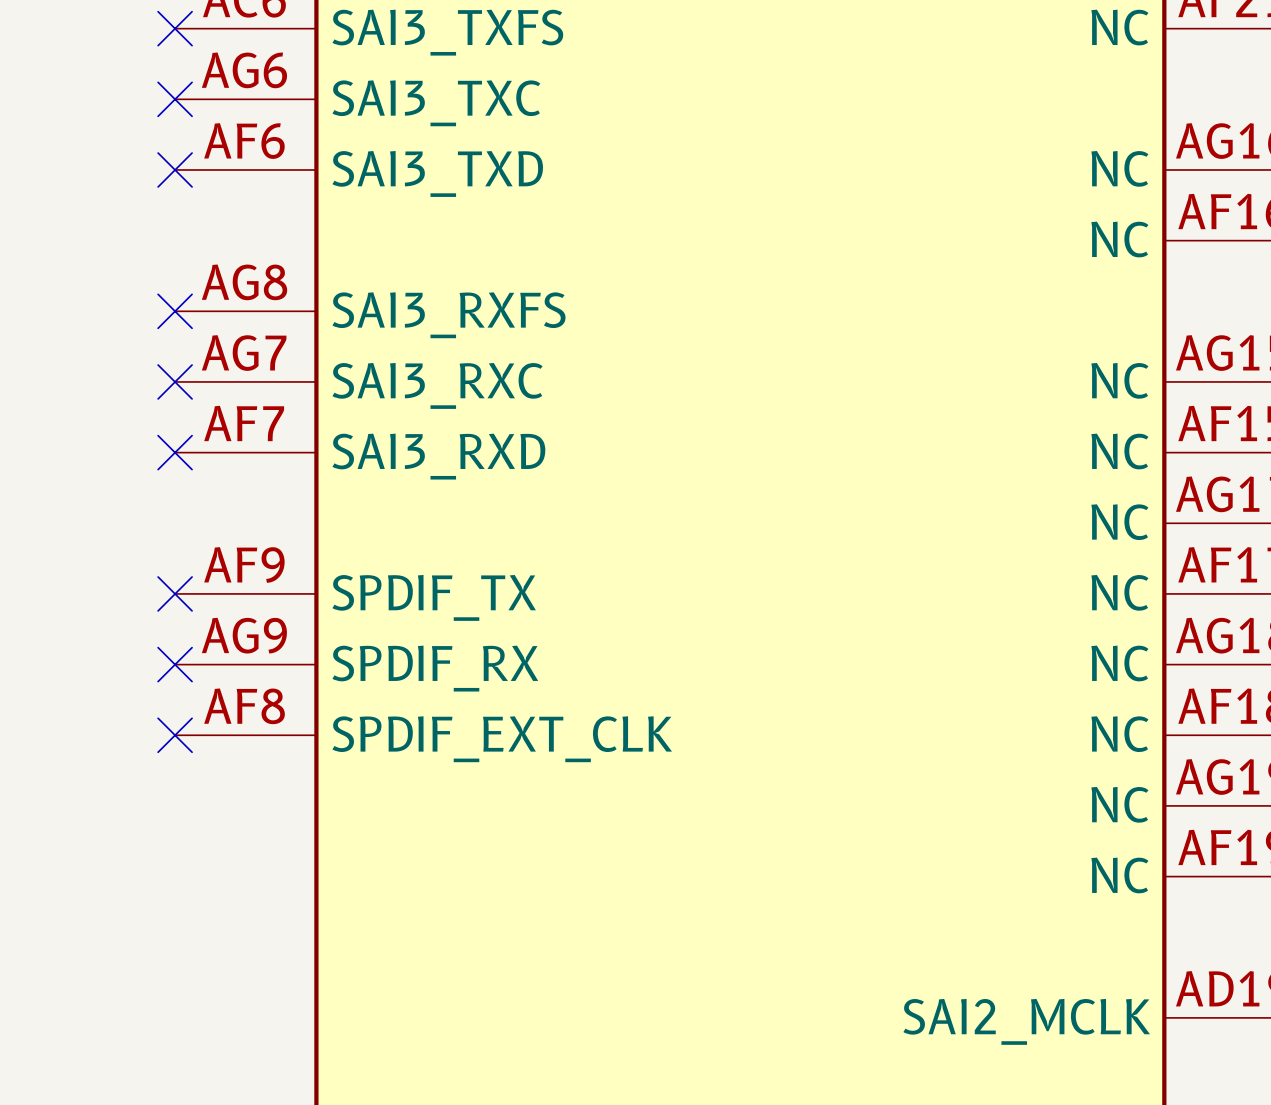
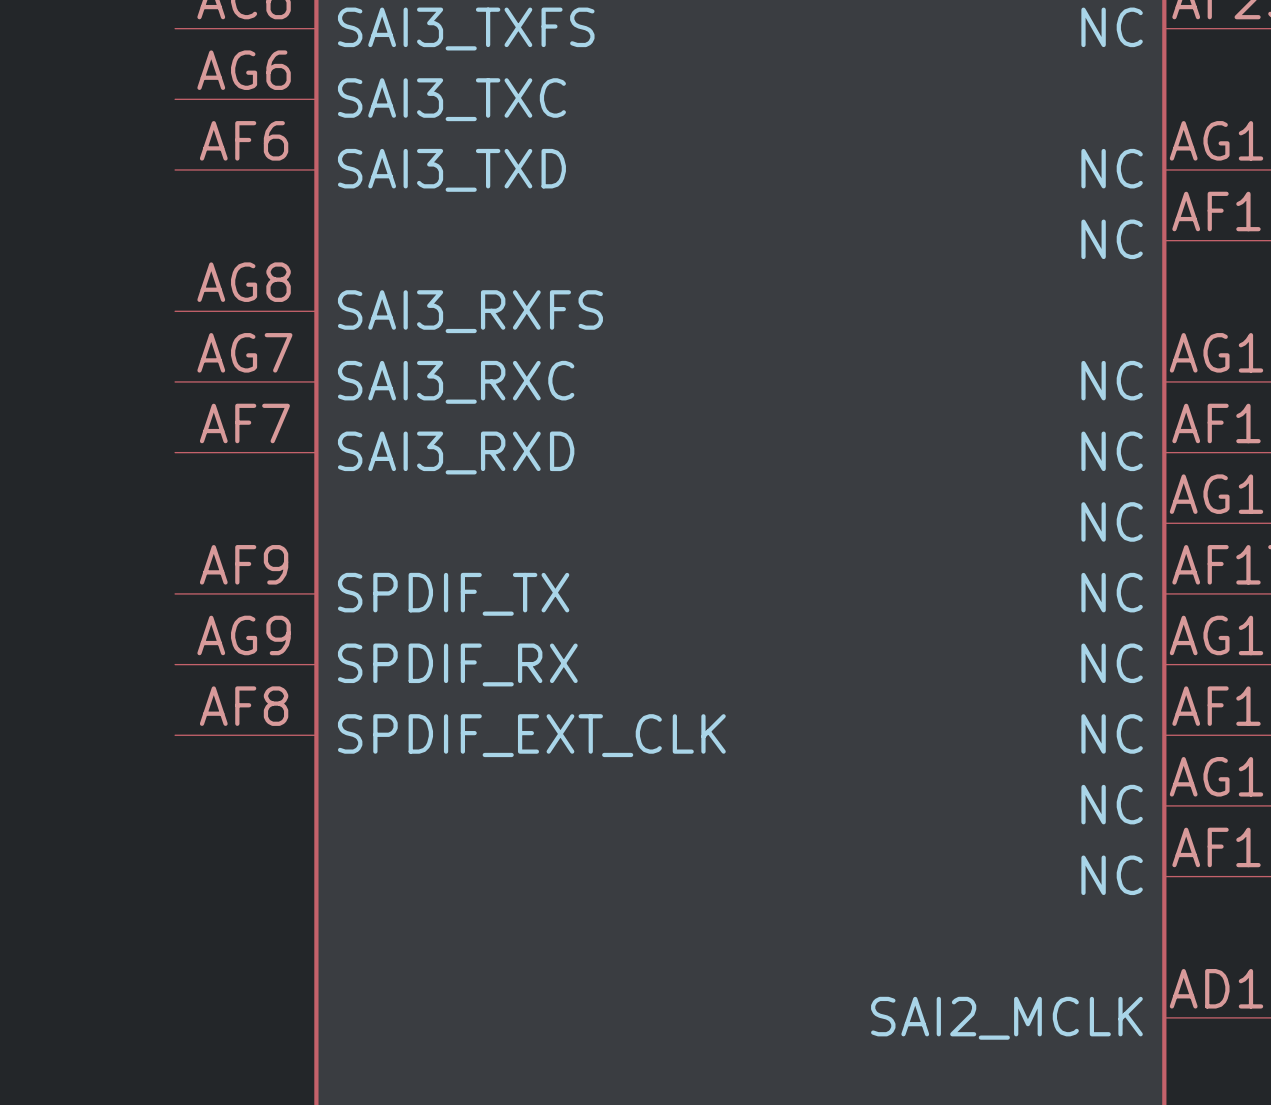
no-connect mark: (175, 28) -> none
no-connect mark: (175, 99) -> none
no-connect mark: (175, 169) -> none
no-connect mark: (175, 311) -> none
no-connect mark: (175, 381) -> none
no-connect mark: (175, 452) -> none
no-connect mark: (175, 593) -> none
no-connect mark: (175, 664) -> none
no-connect mark: (175, 735) -> none

